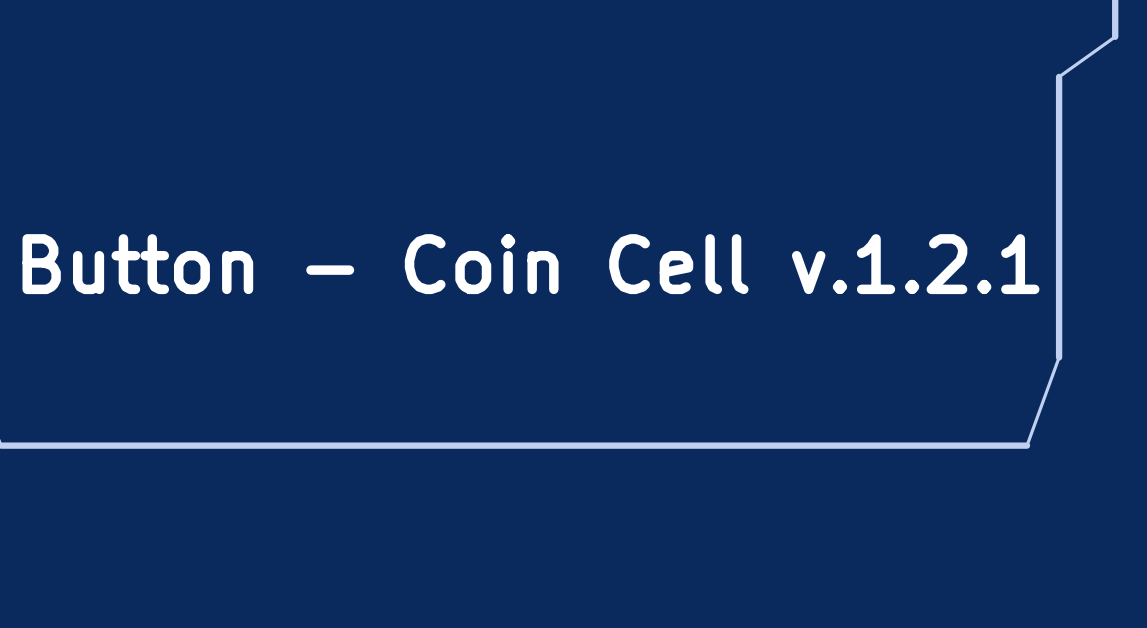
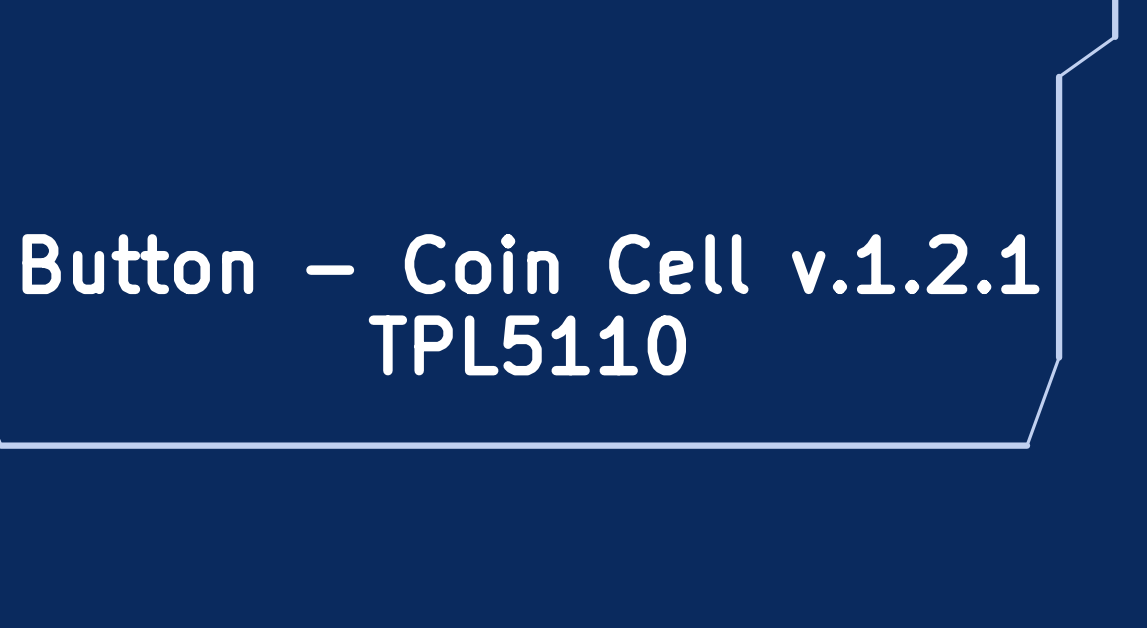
text: none -> TPL5110 (527, 345)

